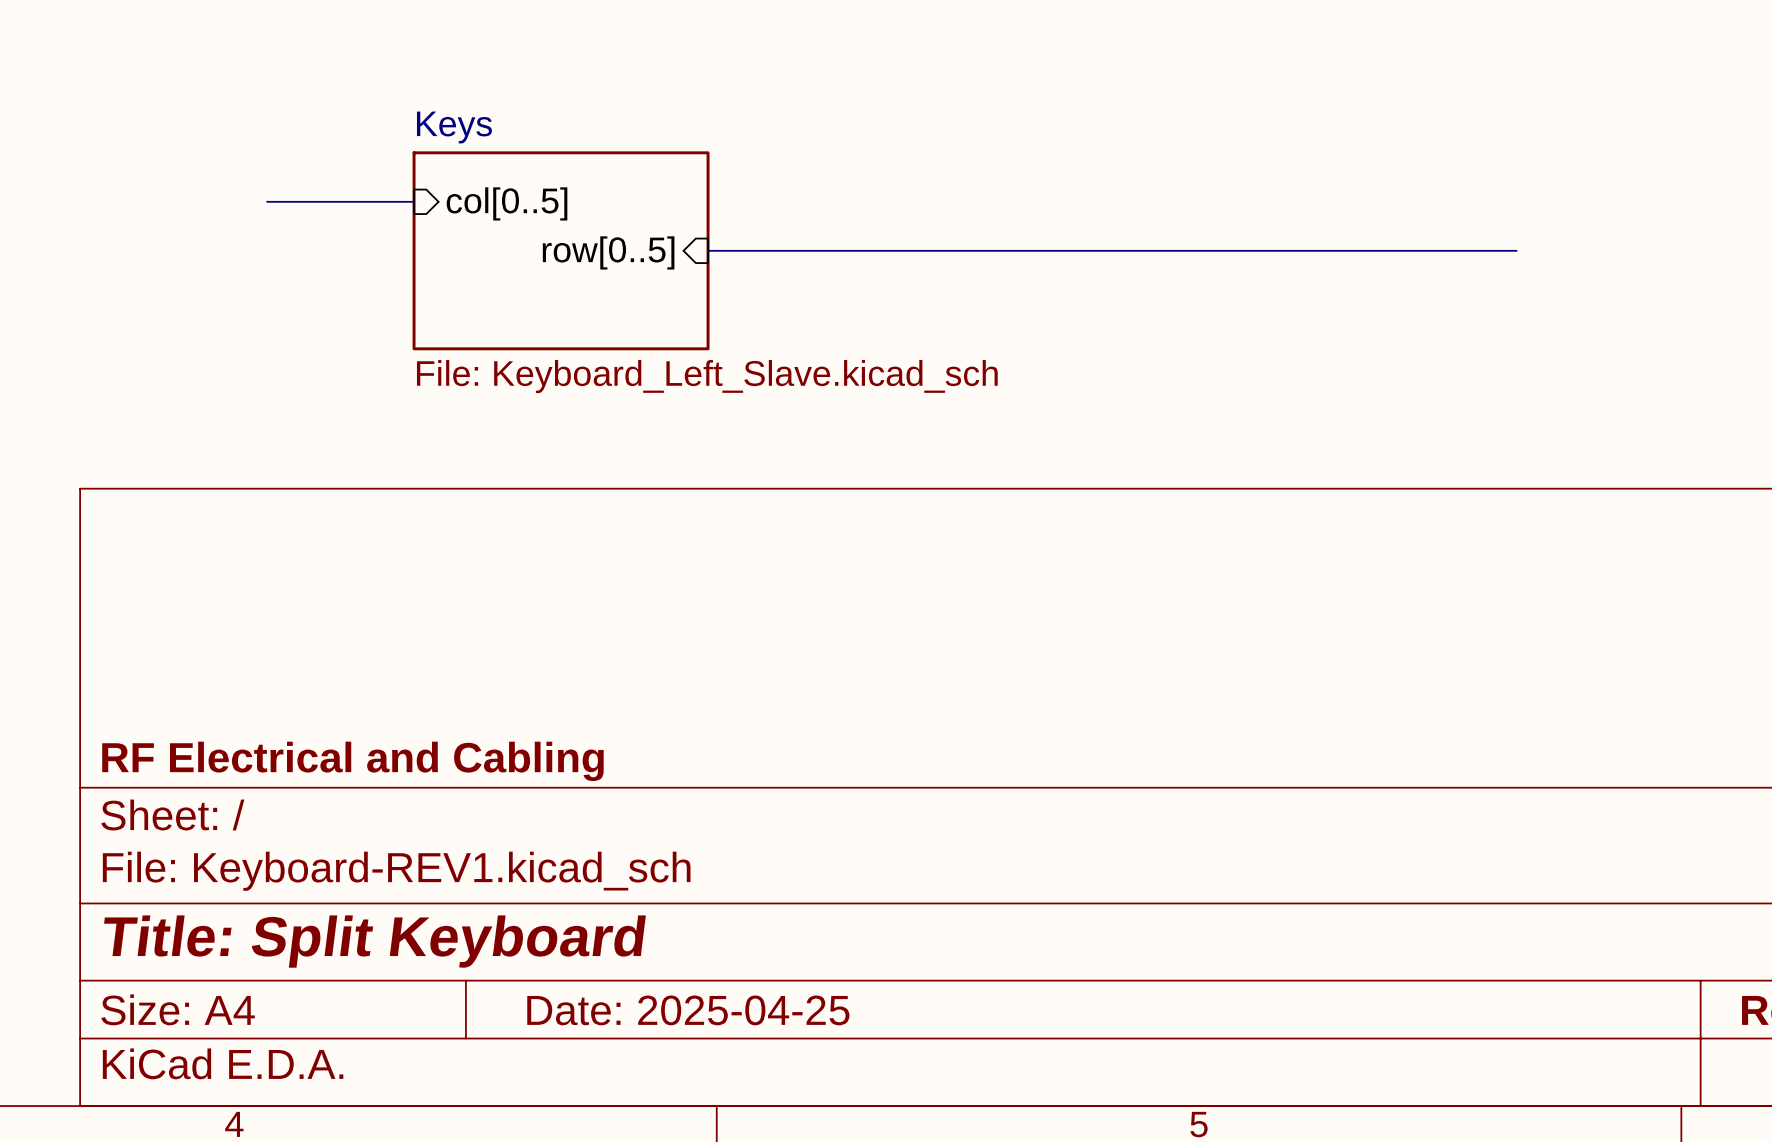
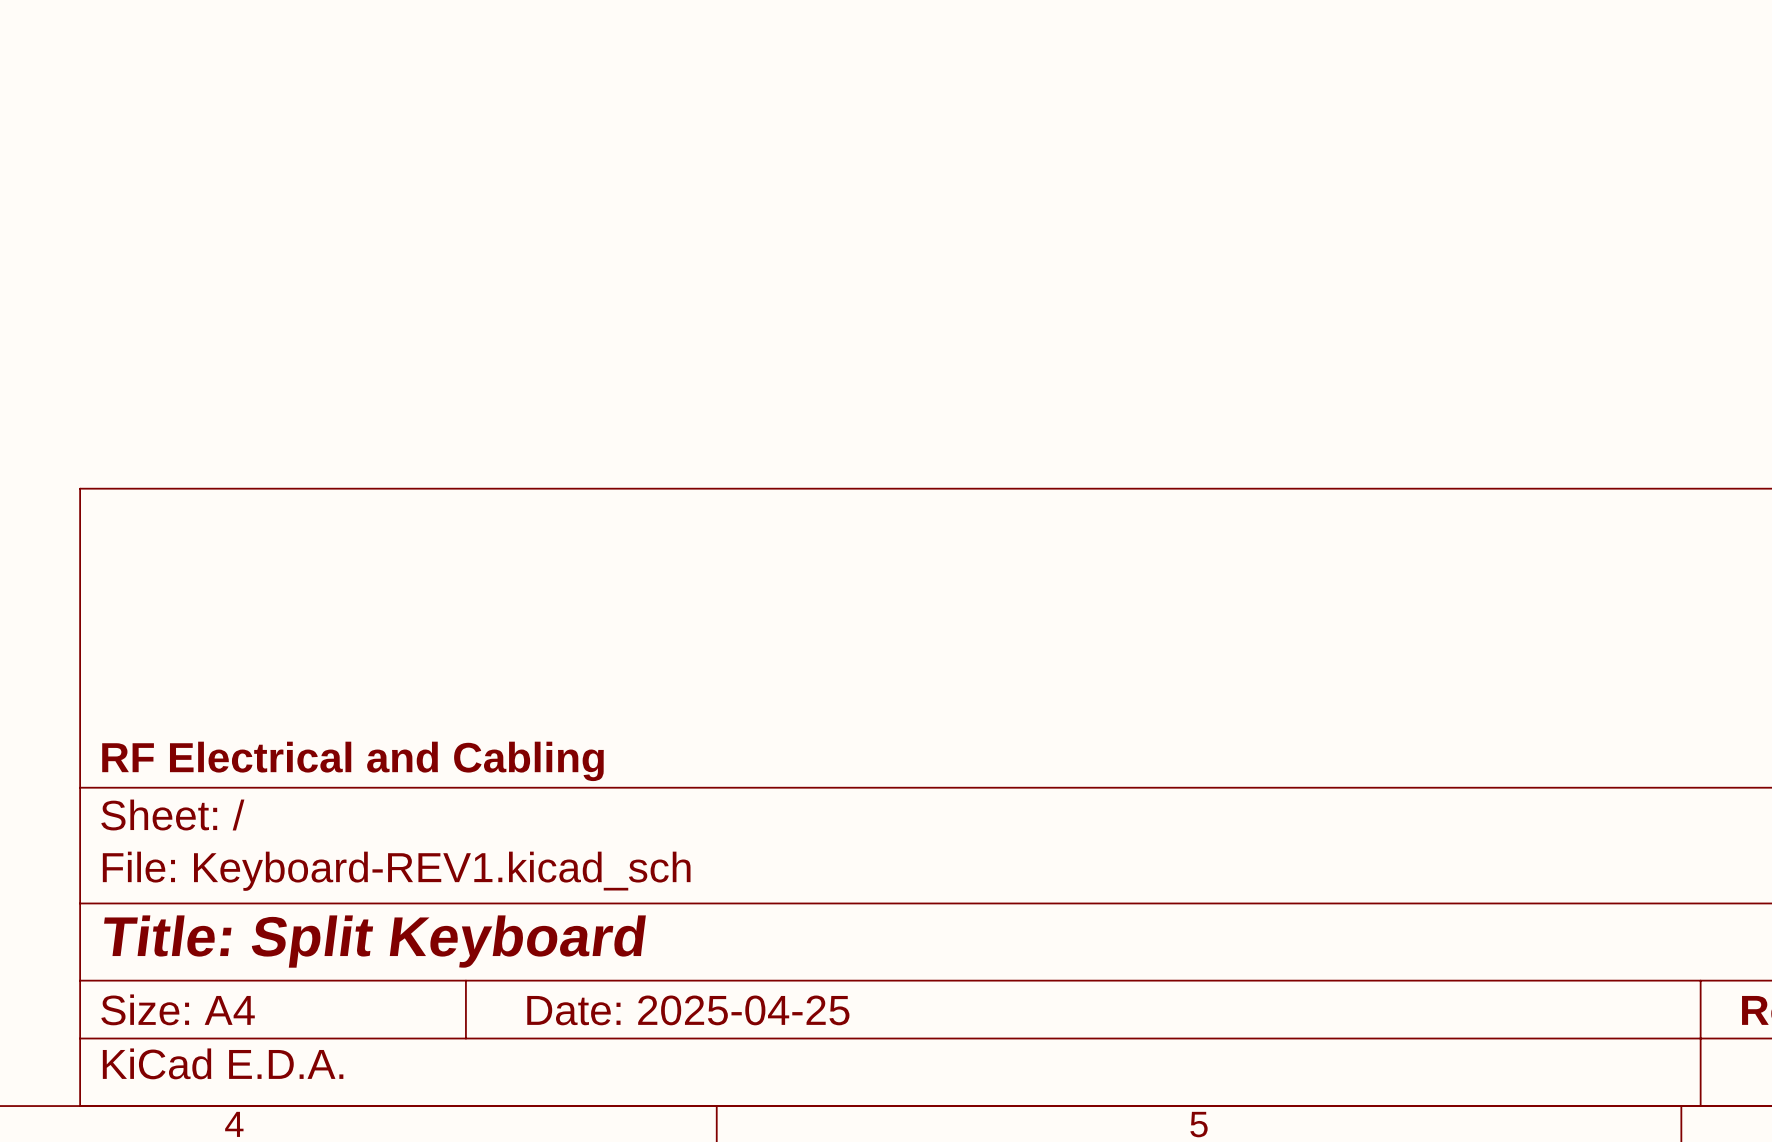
bus: (267, 201) (414, 201) -> none
sheet pin: col[0..5] (507, 203) -> none
sheet Keys: File: Keyboard_Left_Slave.kicad_sch (561, 250) -> none
bus: (708, 250) (1516, 250) -> none
sheet pin: row[0..5] (608, 252) -> none

